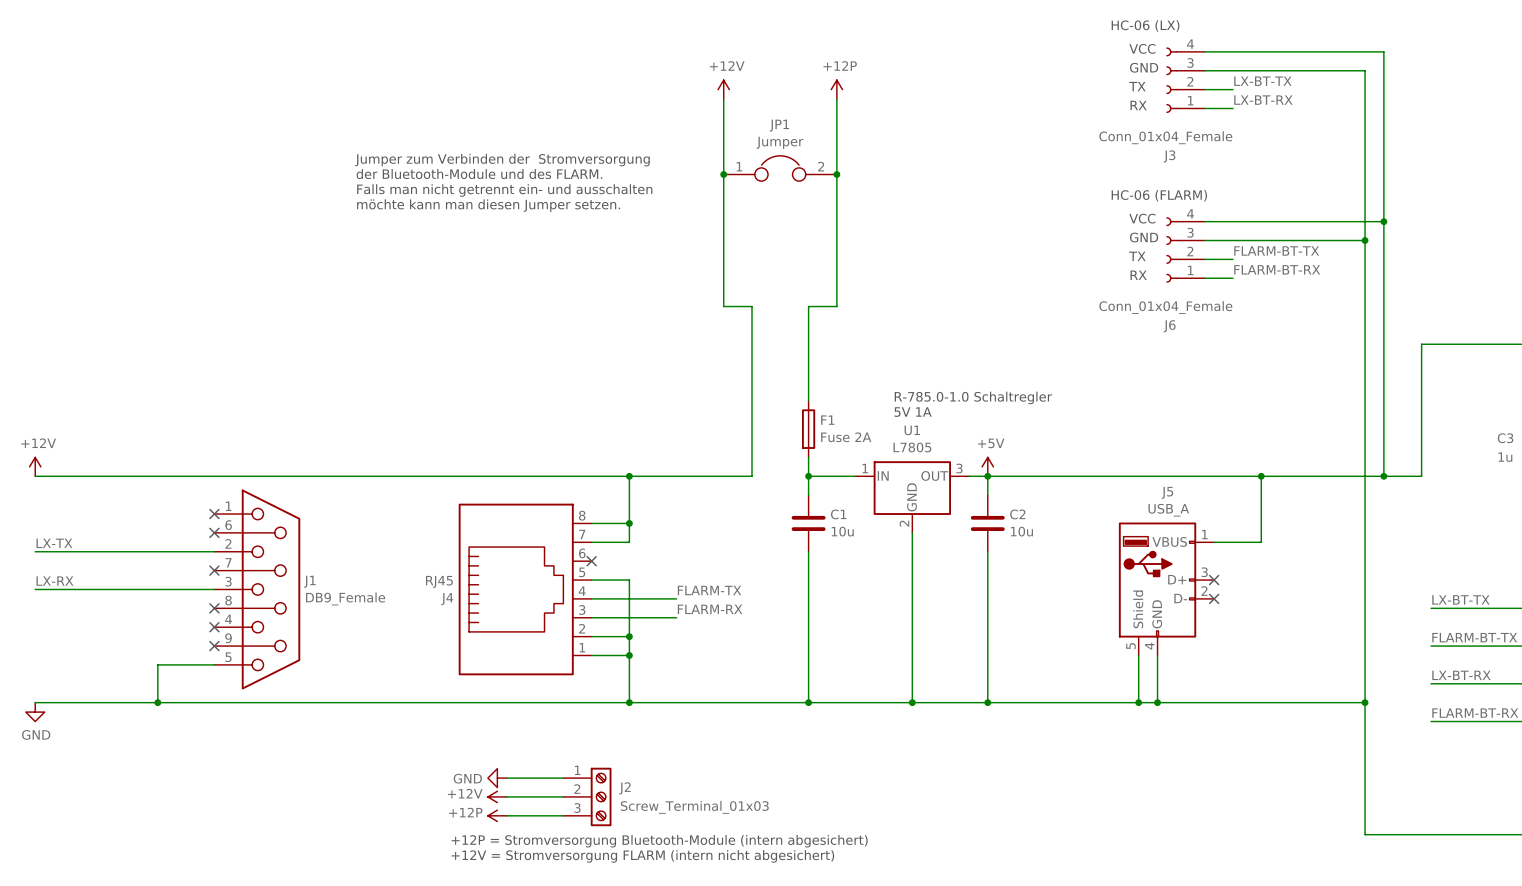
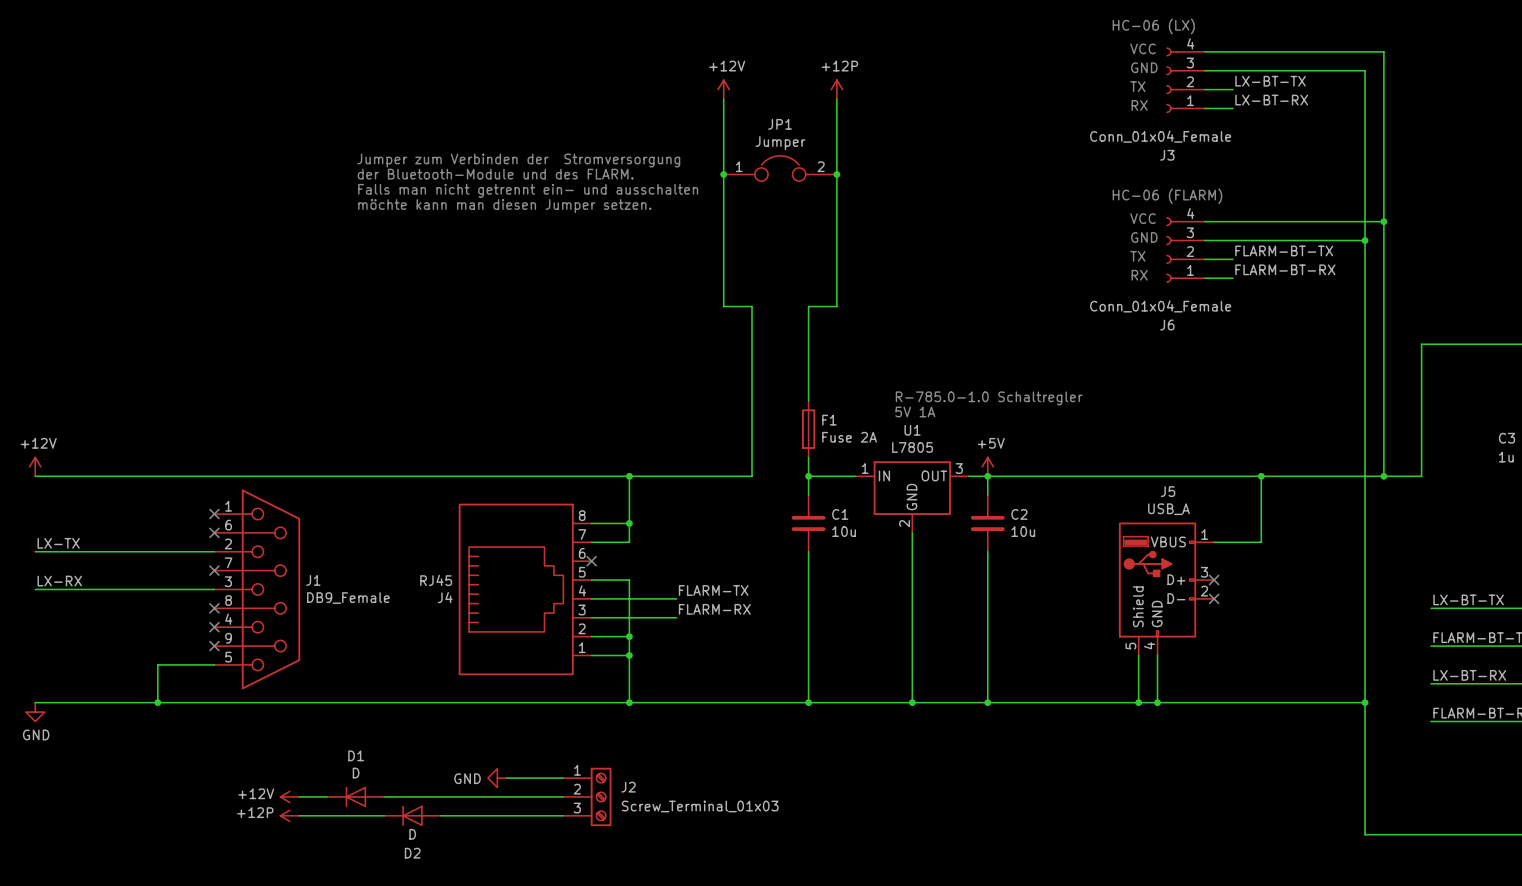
power symbol: none -> +12V (289, 796)
wire: none -> (299, 796) (327, 796)
D1: none -> D (355, 796)
wire: none -> (384, 796) (506, 796)
power symbol: +12V (497, 796) -> none
power symbol: none -> +12P (289, 815)
wire: none -> (299, 815) (384, 815)
D2: none -> D (412, 815)
wire: none -> (440, 815) (506, 815)
power symbol: +12P (497, 815) -> none
text: +12P = Stromversorgung Bluetooth-Module (intern abgesichert) (659, 841) -> none
text: +12V = Stromversorgung FLARM (intern nicht abgesichert) (642, 856) -> none

